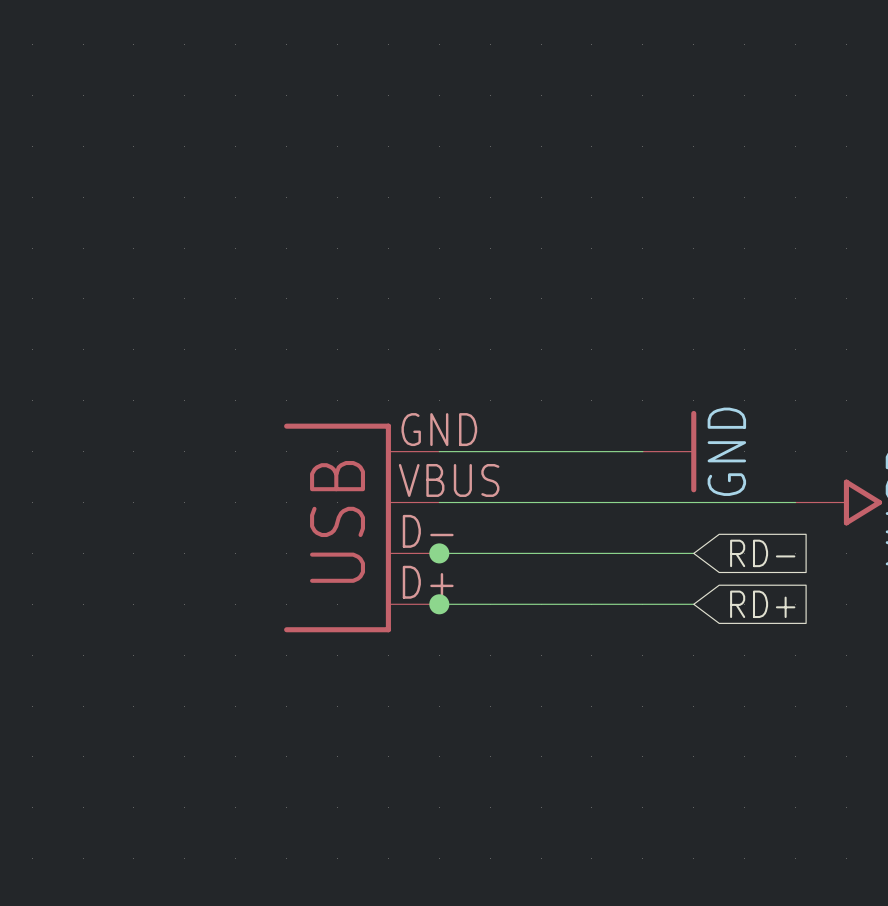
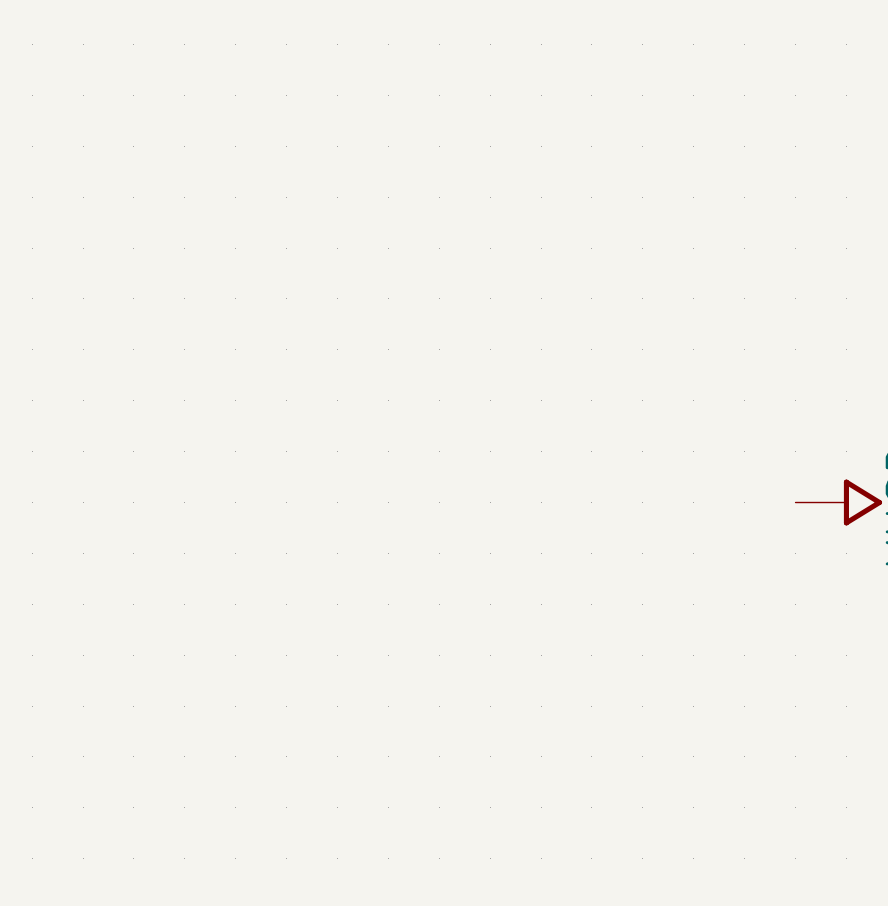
wire: (439, 451) (642, 451) -> none
power symbol: GND (669, 451) -> none
wire: (439, 502) (795, 502) -> none
part: (361, 527) -> none
wire: (439, 553) (693, 553) -> none
junction: (439, 553) -> none
global label: RD- (762, 553) -> none
wire: (439, 604) (693, 604) -> none
junction: (439, 604) -> none
global label: RD+ (762, 604) -> none

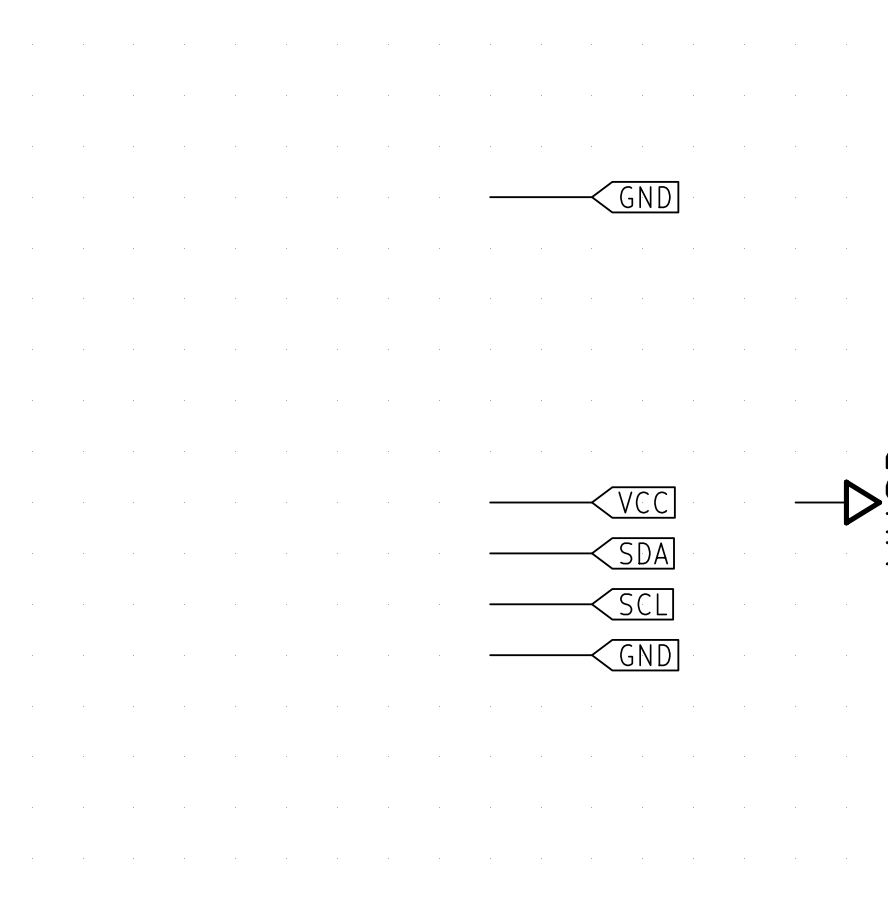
wire: none -> (490, 197) (591, 197)
global label: none -> GND (645, 197)
wire: none -> (490, 502) (591, 502)
global label: none -> VCC (642, 502)
wire: none -> (490, 553) (591, 553)
global label: none -> SDA (644, 553)
wire: none -> (490, 604) (591, 604)
global label: none -> SCL (643, 604)
wire: none -> (490, 655) (591, 655)
global label: none -> GND (645, 655)

